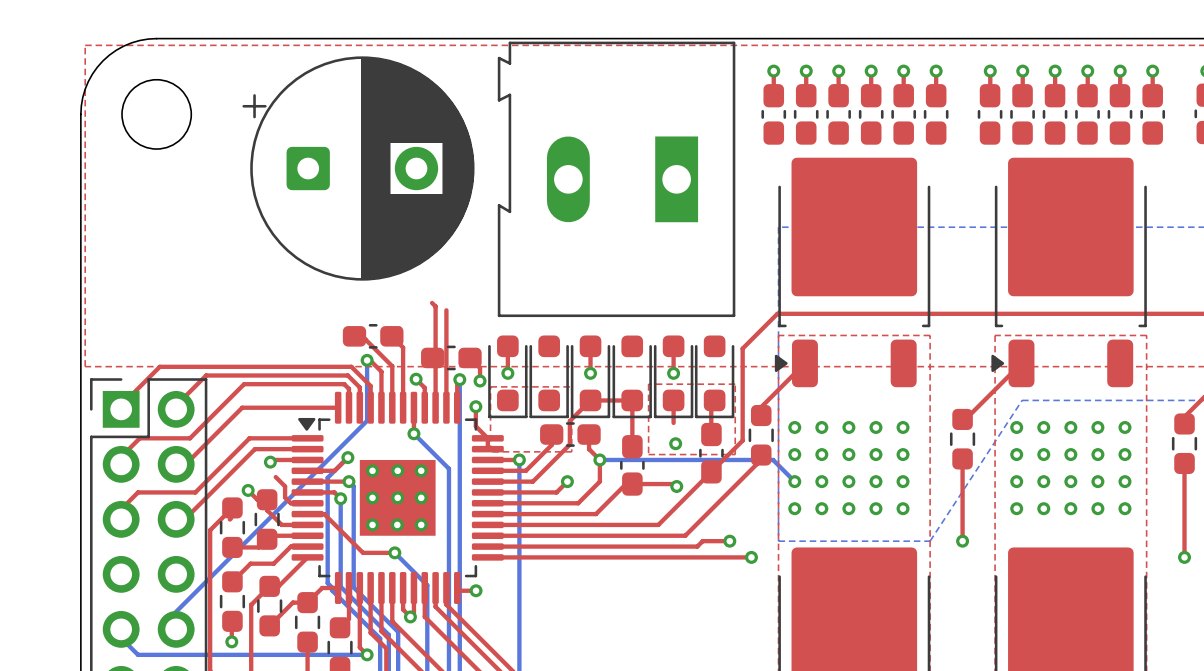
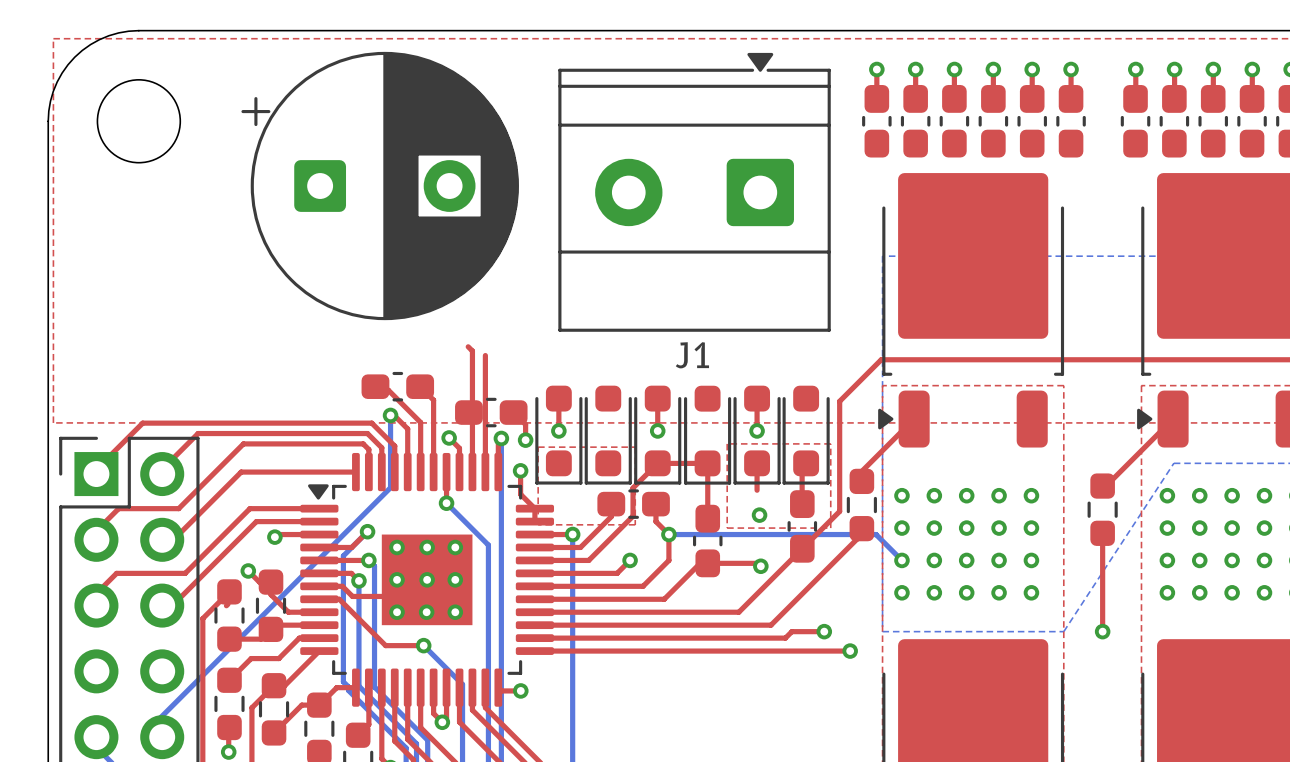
J1: none -> (694, 192)
part: (616, 179) -> none
top track: (275, 477) (285, 486) (285, 497) (290, 503) (307, 503) -> (420, 586) (410, 596) (352, 596) (342, 586) (319, 586)

